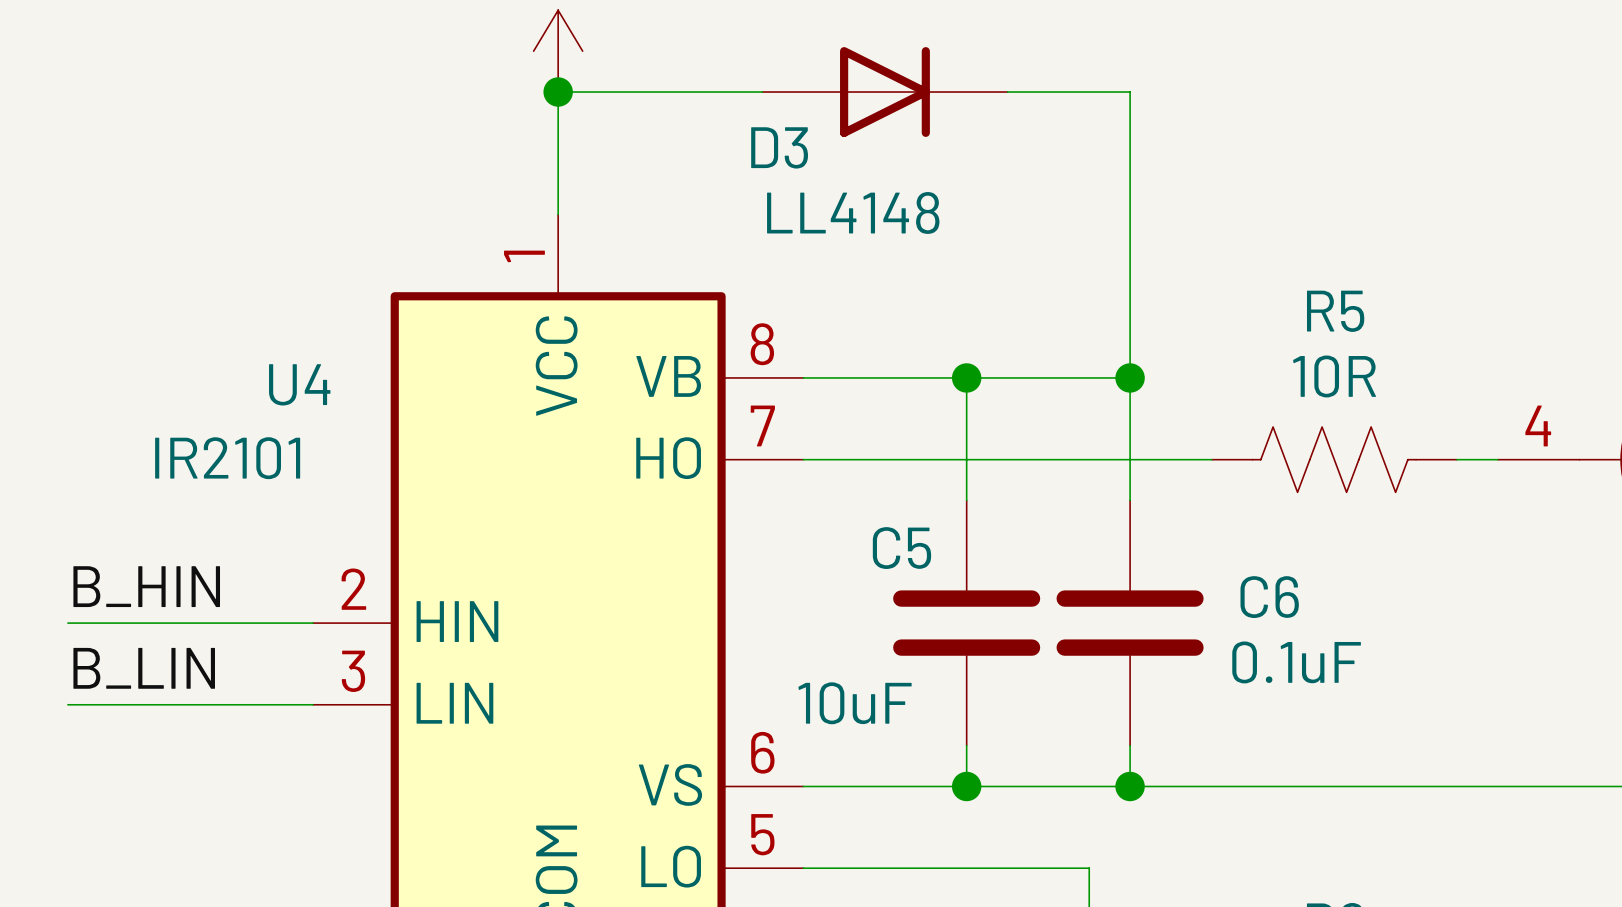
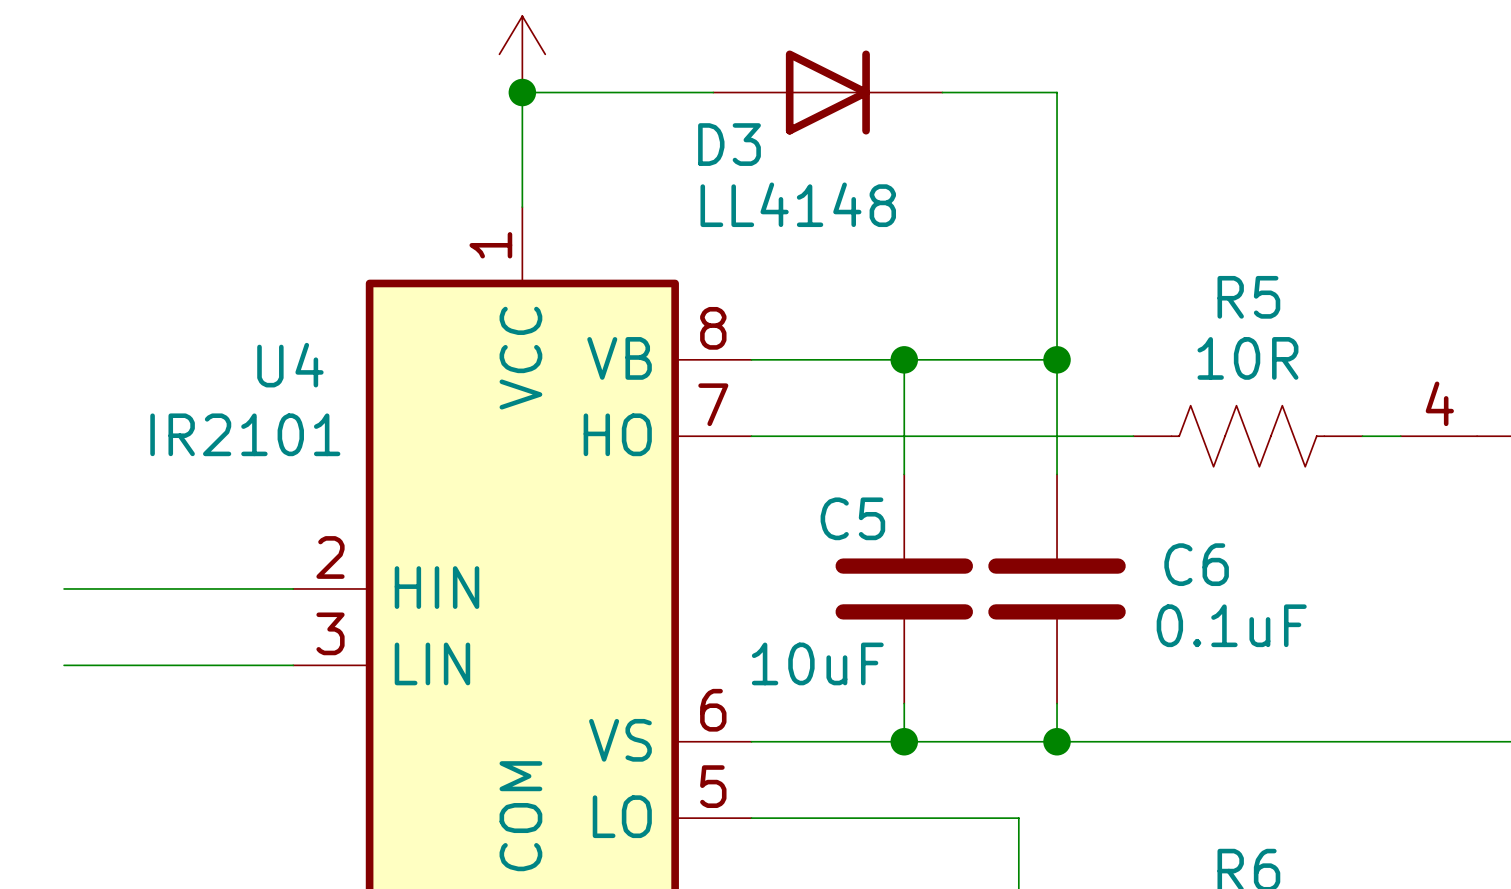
label: B_HIN (146, 586) -> none
label: B_LIN (144, 668) -> none

